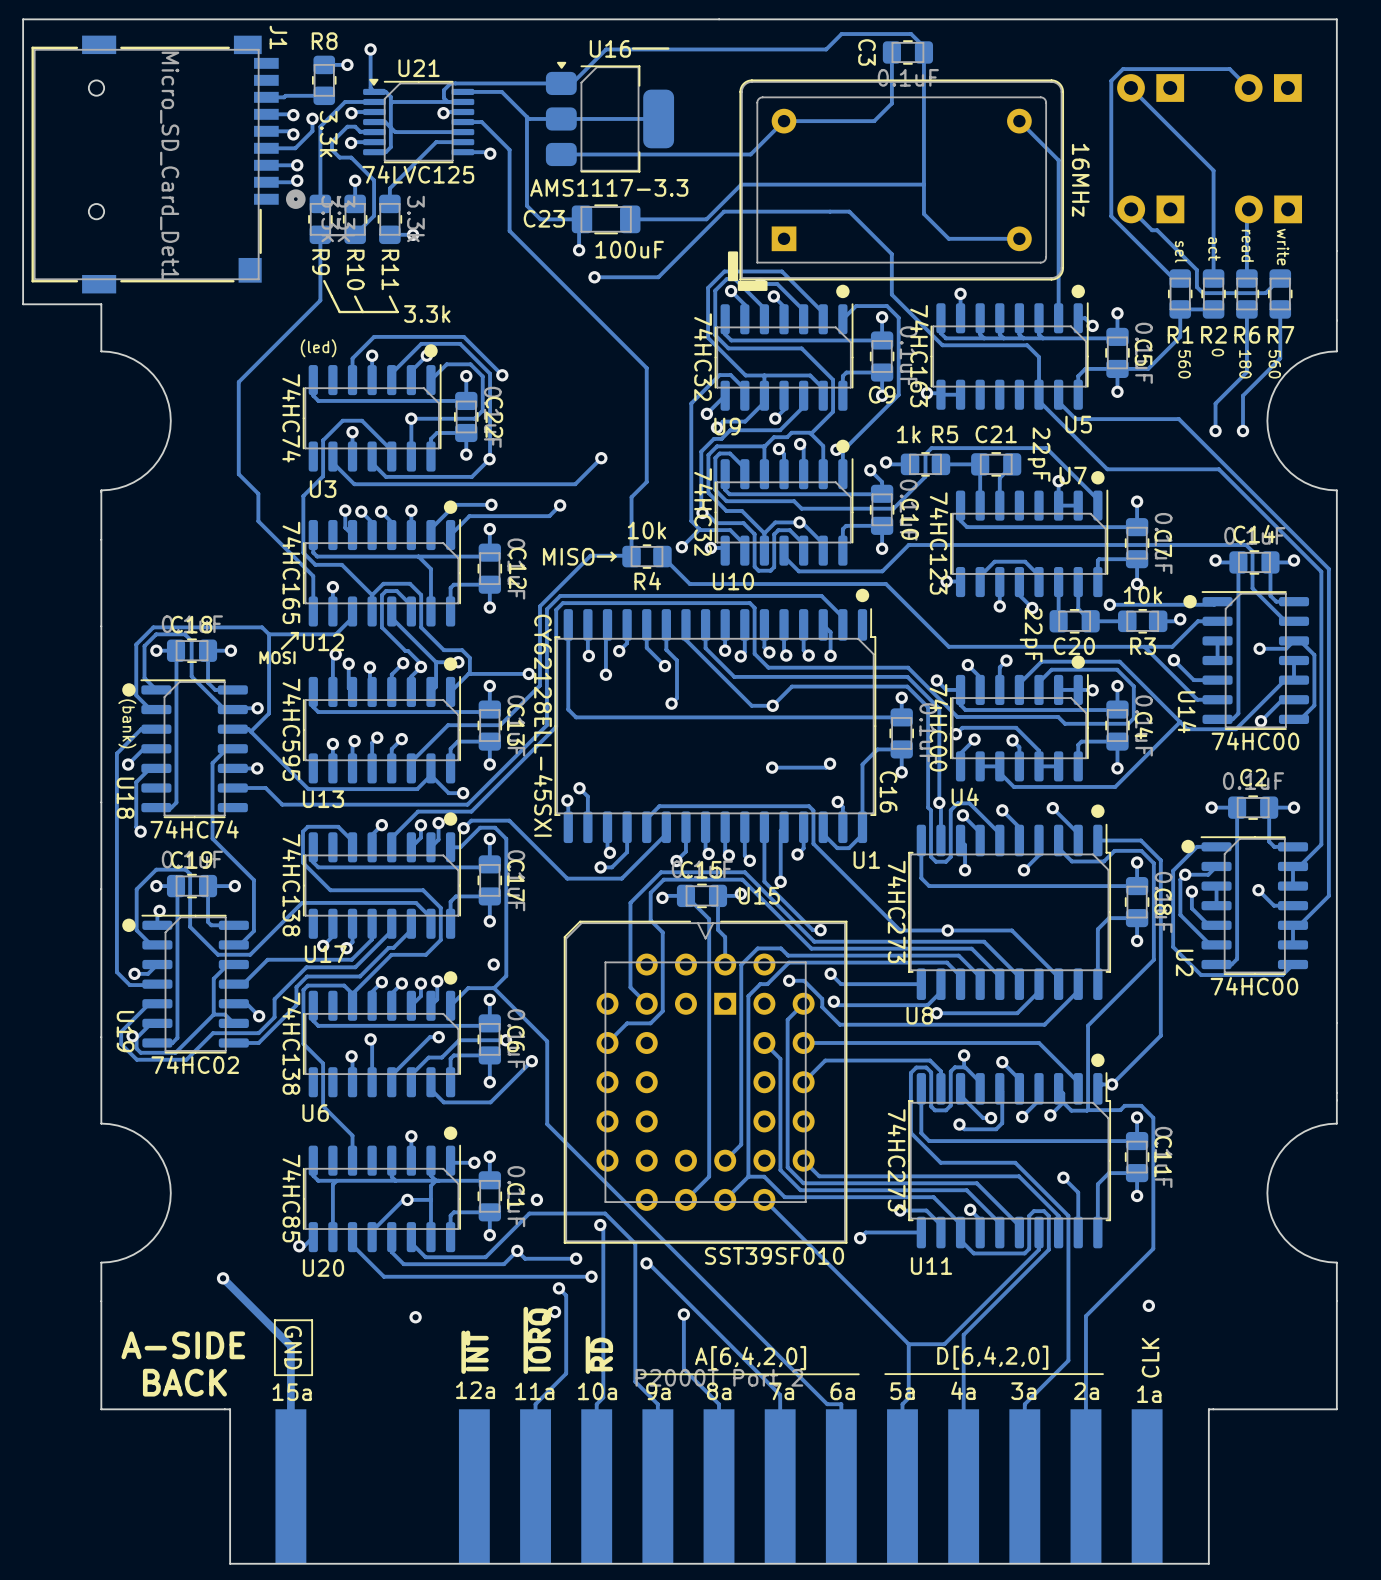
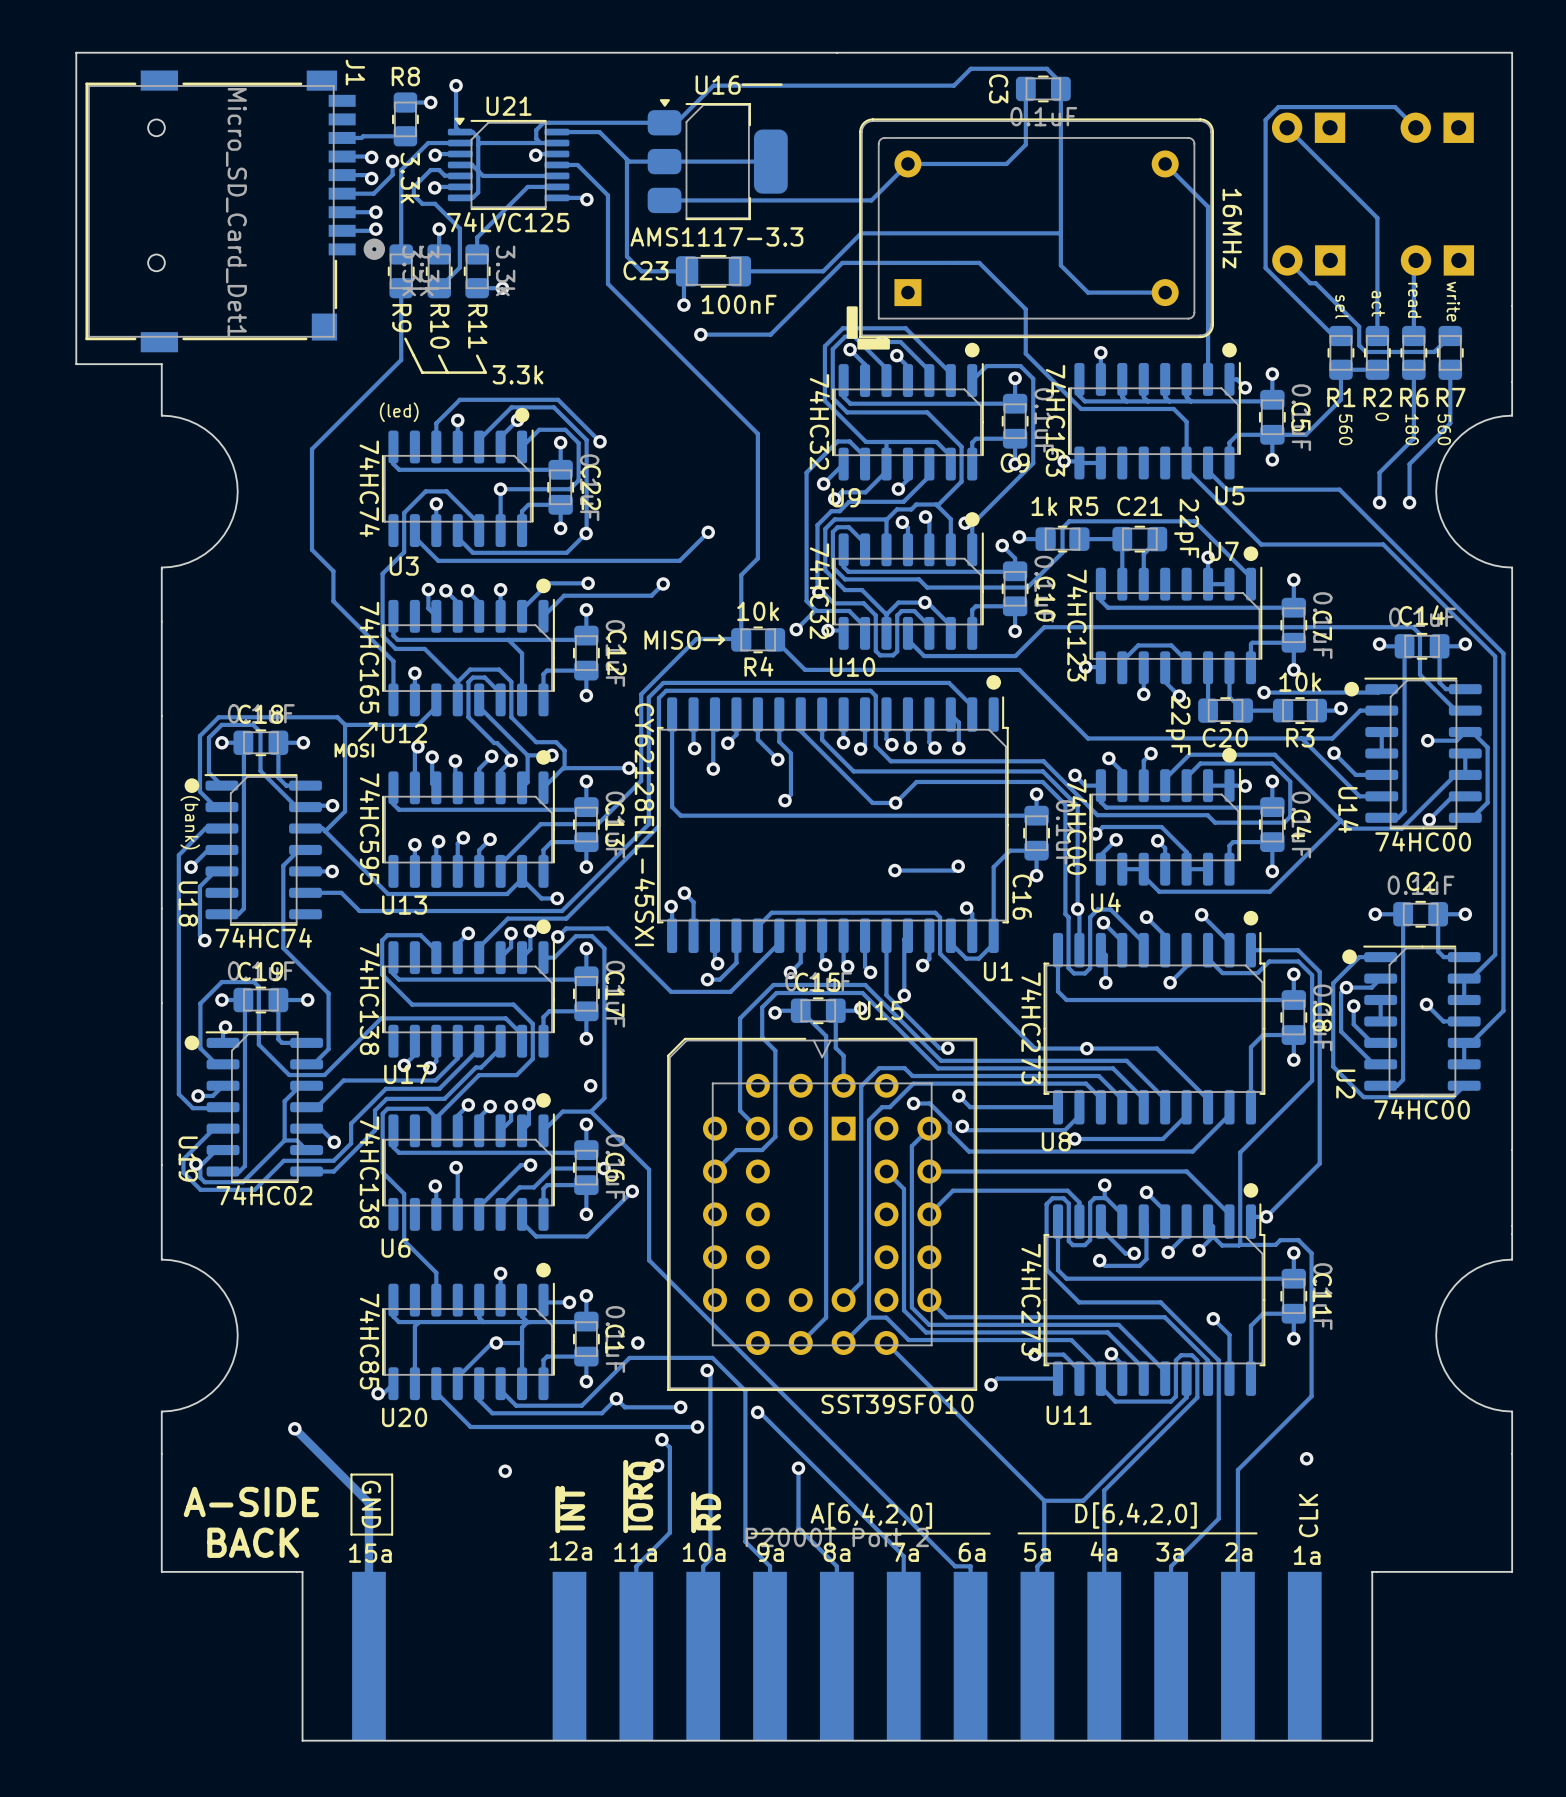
C23 value: 100uF (629, 249) -> 100nF (739, 304)

